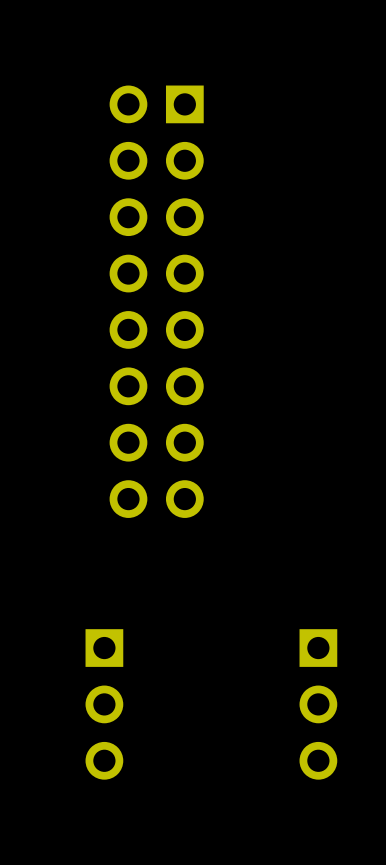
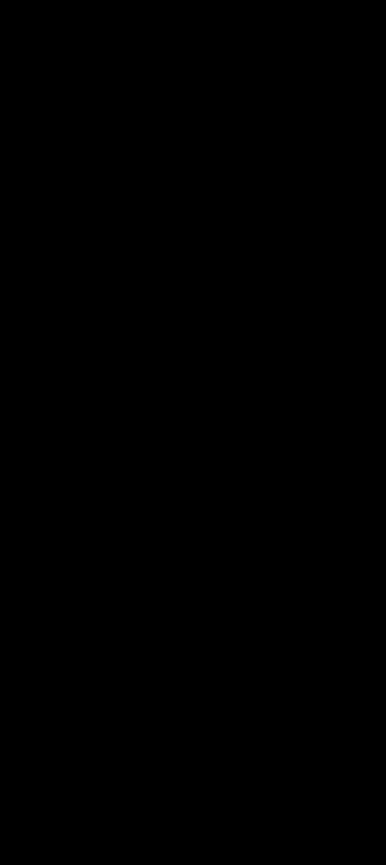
part: (156, 301) -> none
part: (104, 704) -> none
part: (318, 704) -> none

